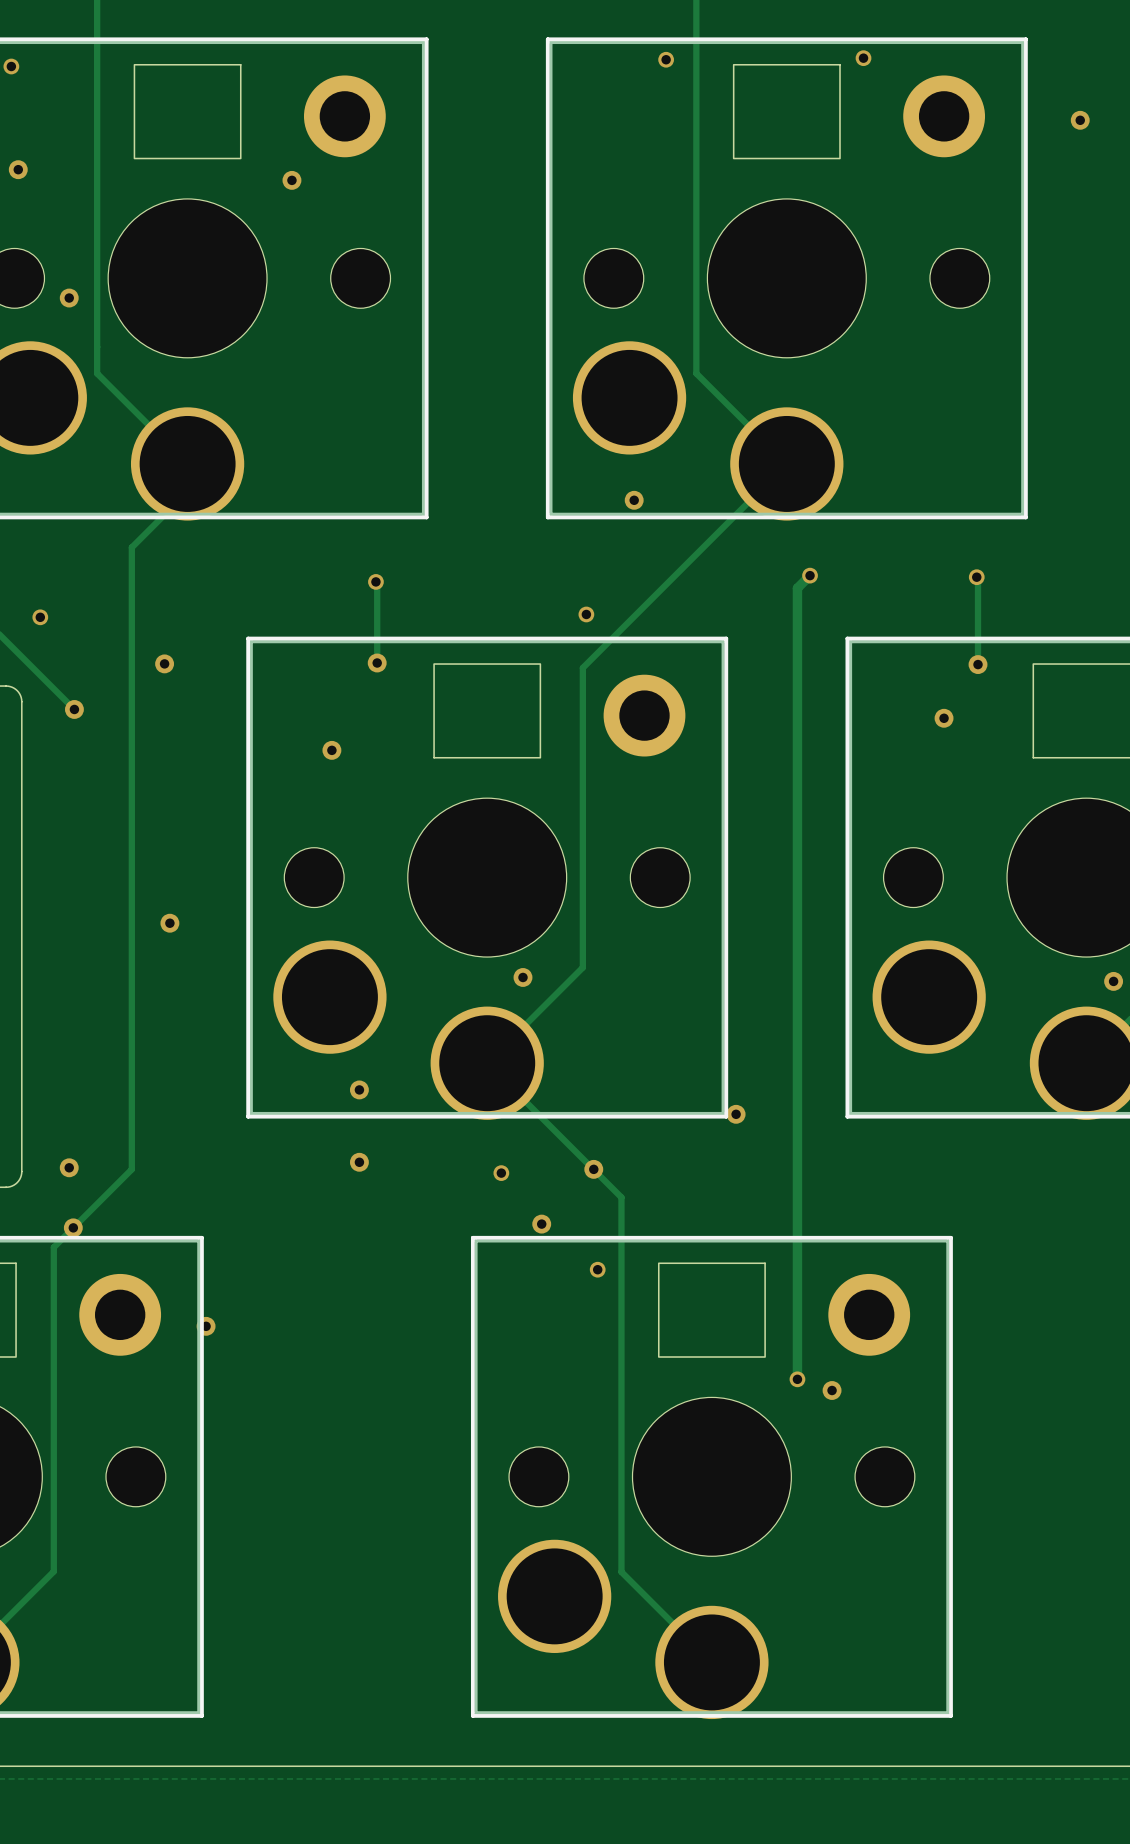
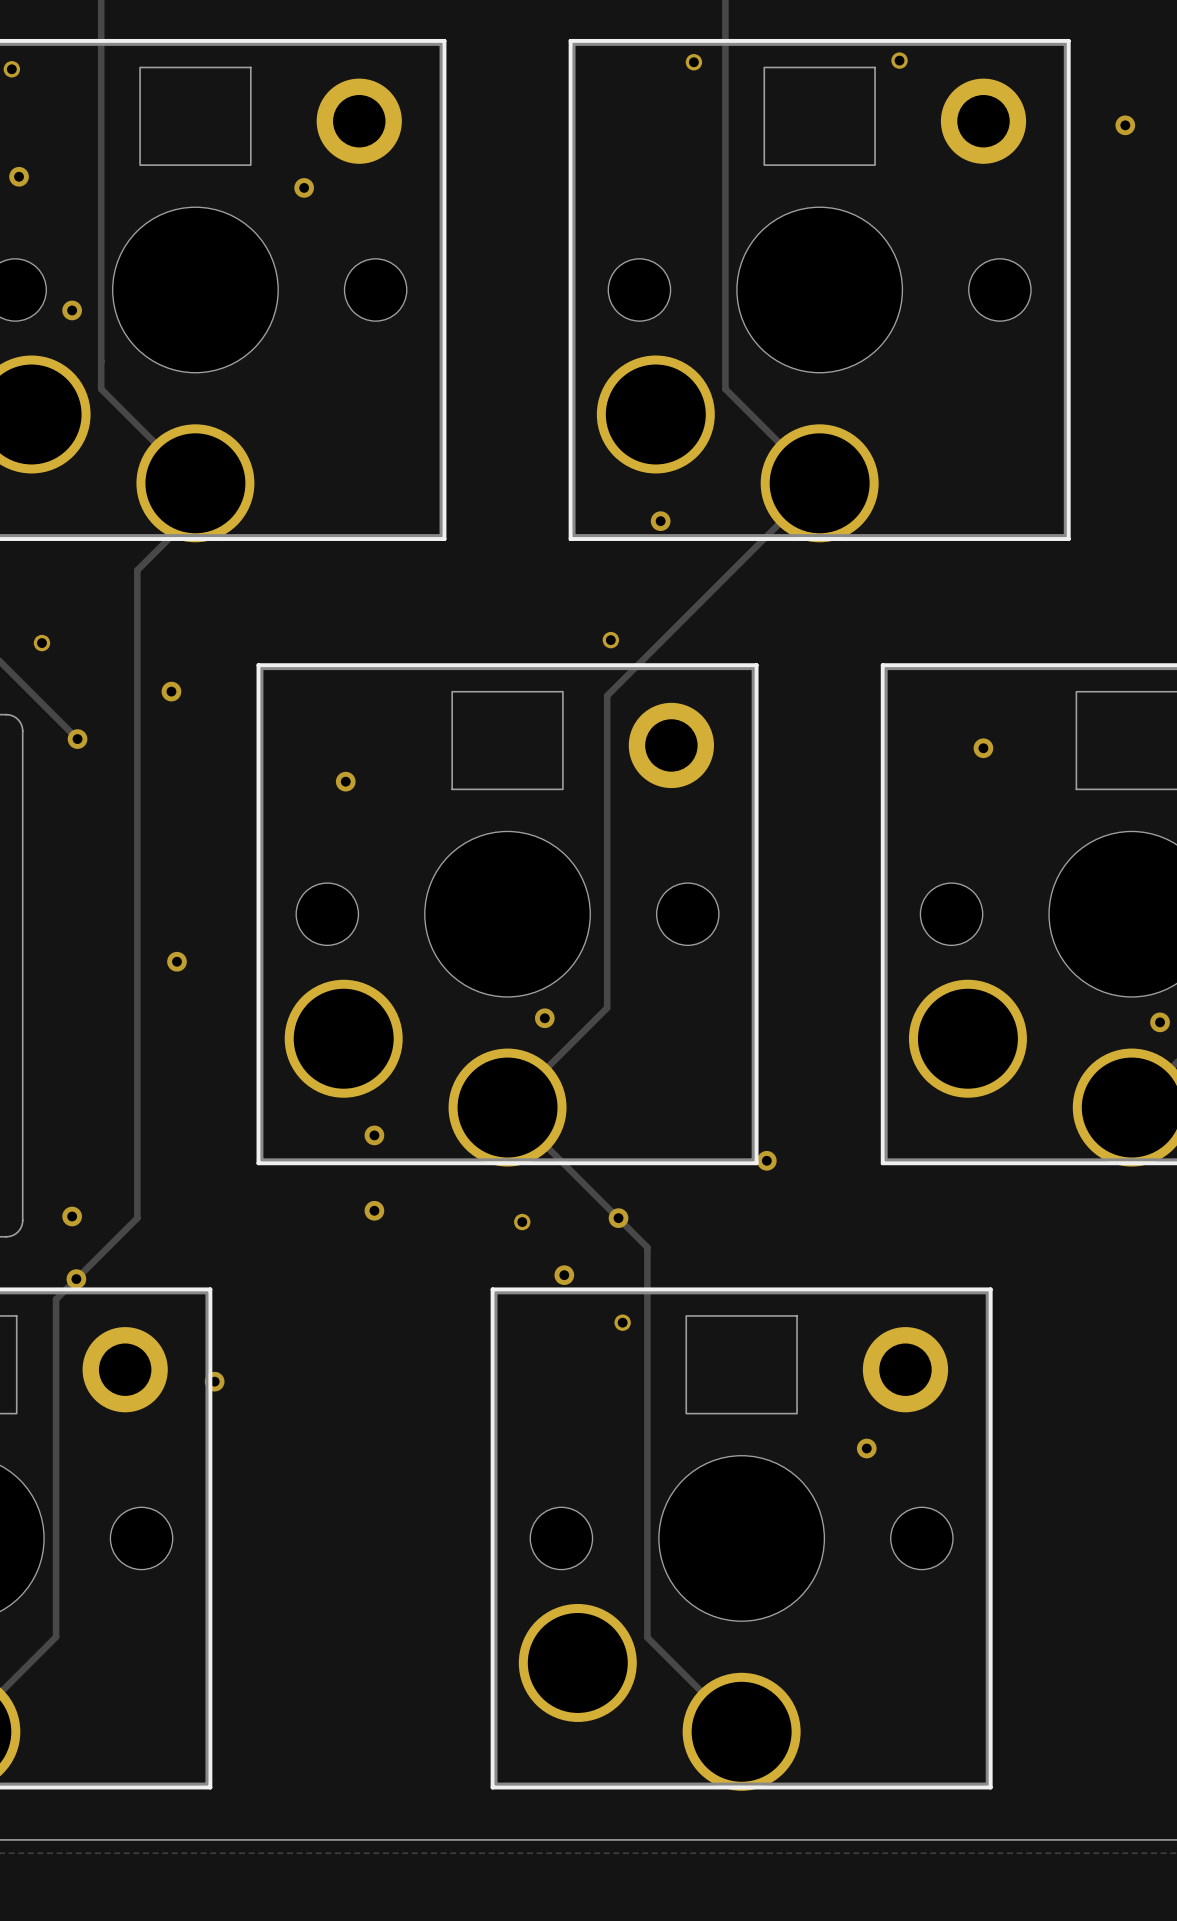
track: (810, 575) (797, 588) (797, 1379) -> none
via: (810, 575) -> none
track: (976, 577) (978, 664) -> none
via: (976, 577) -> none
track: (375, 581) (377, 662) -> none
via: (375, 581) -> none
via: (377, 662) -> none
via: (978, 664) -> none
via: (797, 1379) -> none

